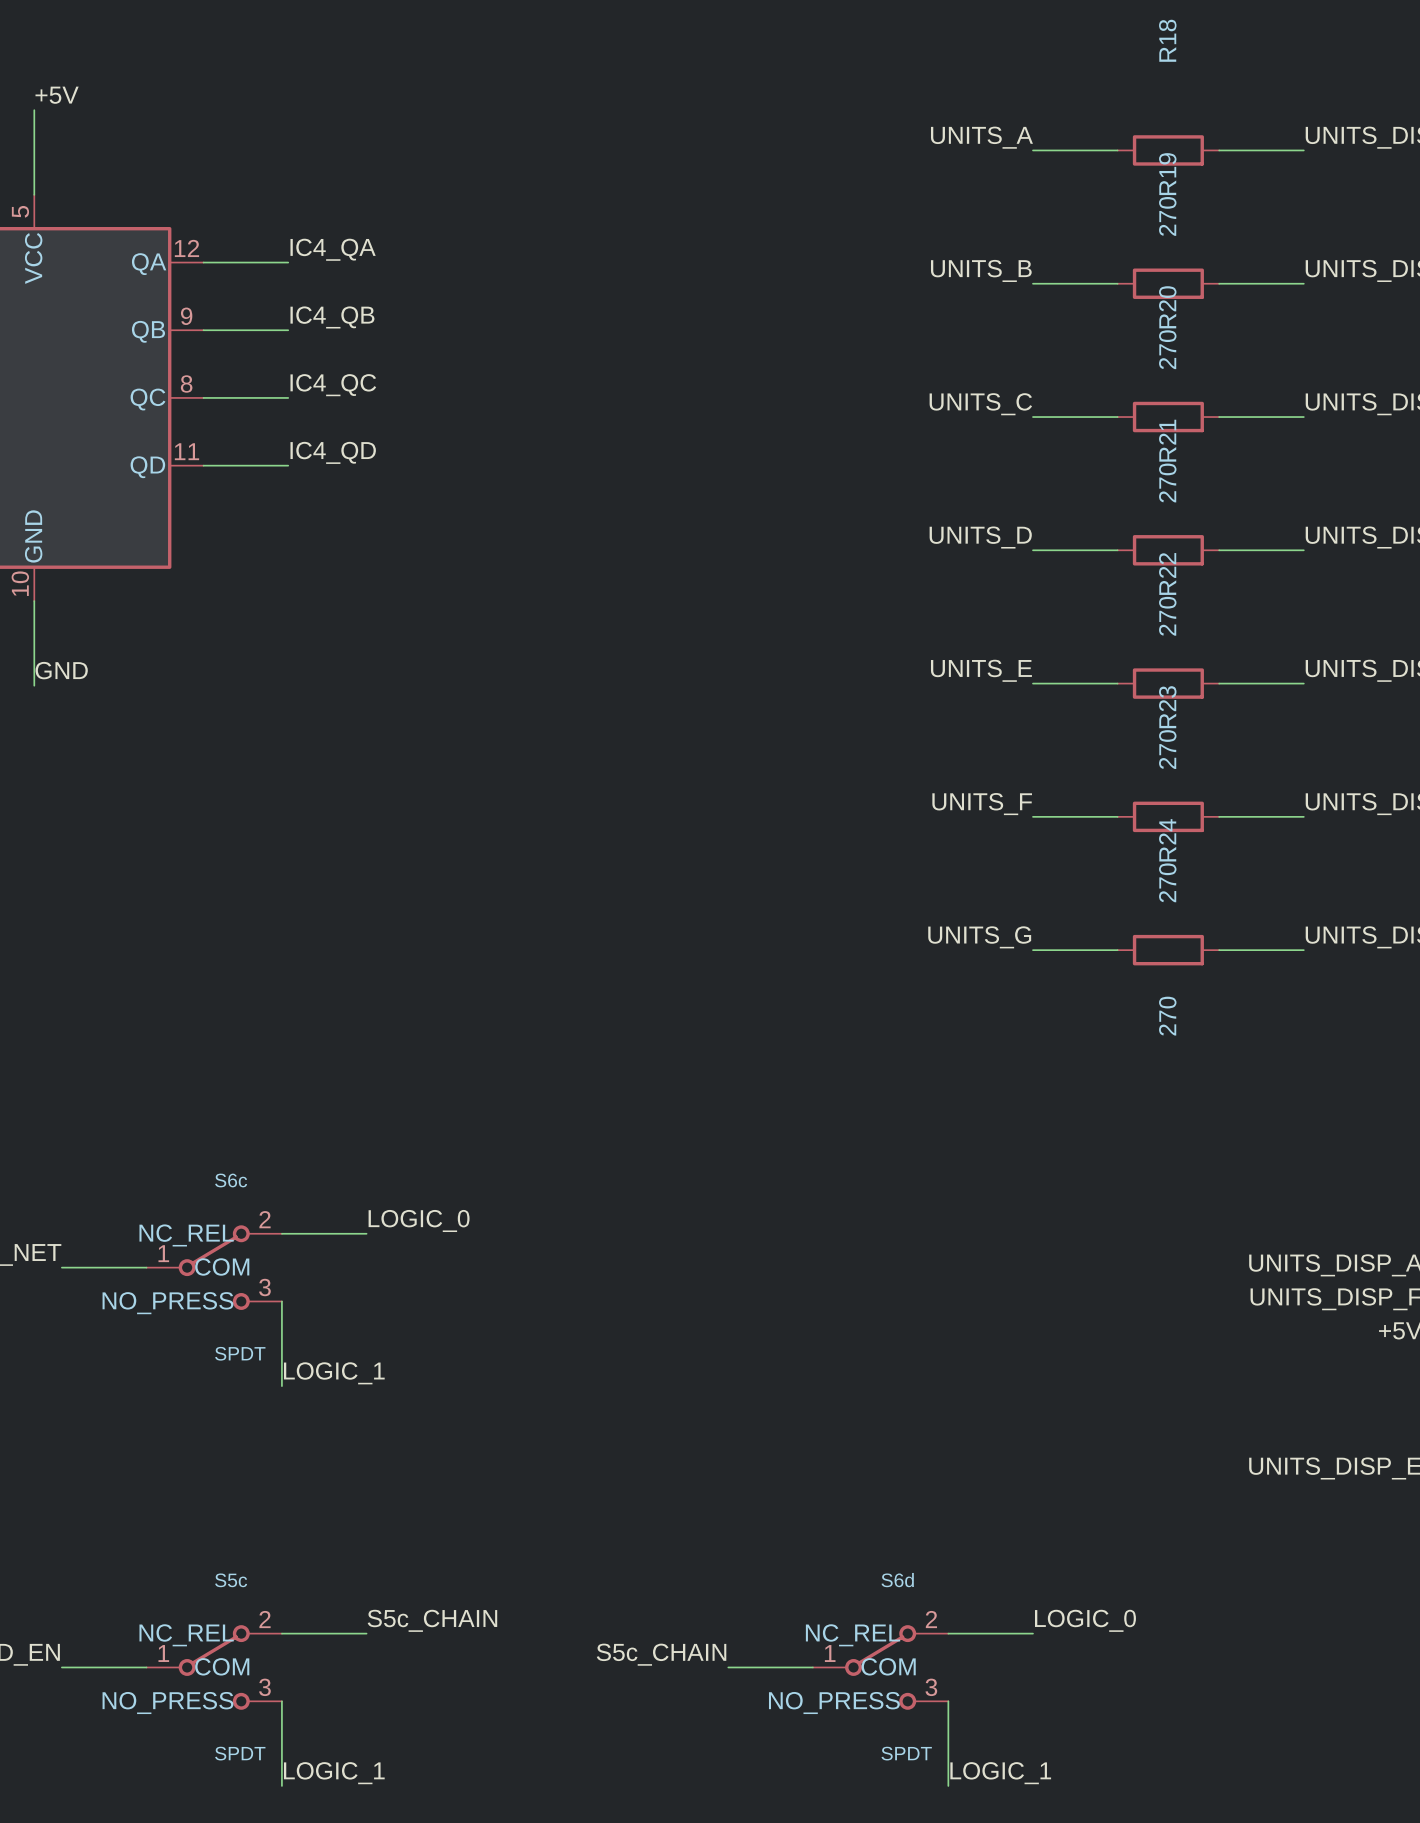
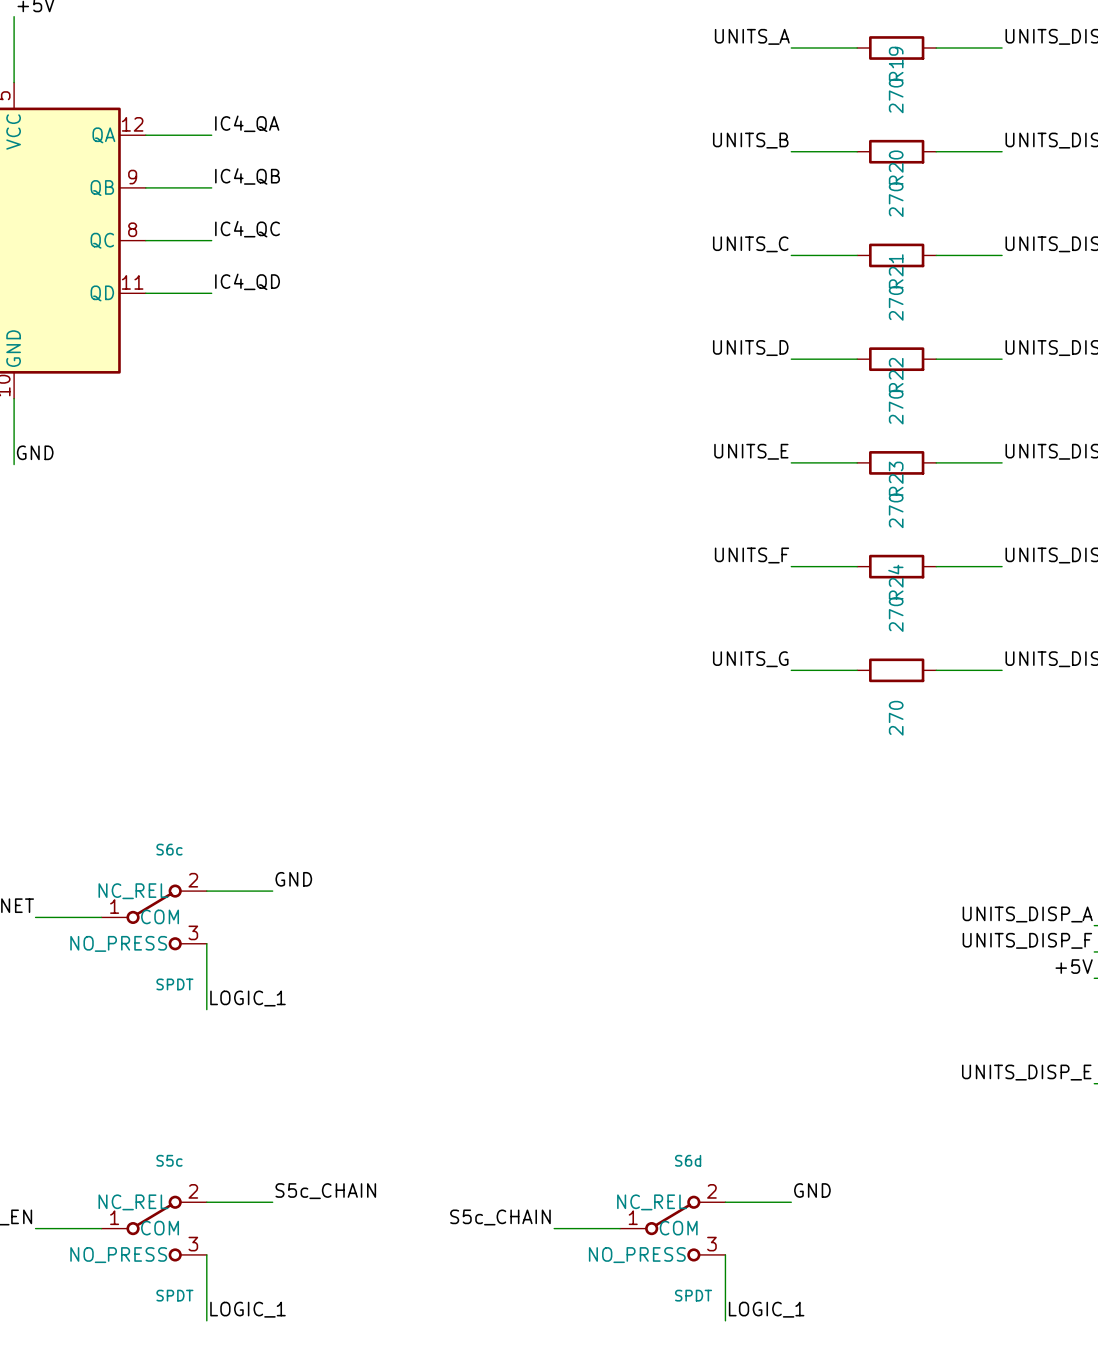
label: LOGIC_0 (419, 1220) -> GND (293, 879)
label: LOGIC_0 (1085, 1620) -> GND (812, 1190)

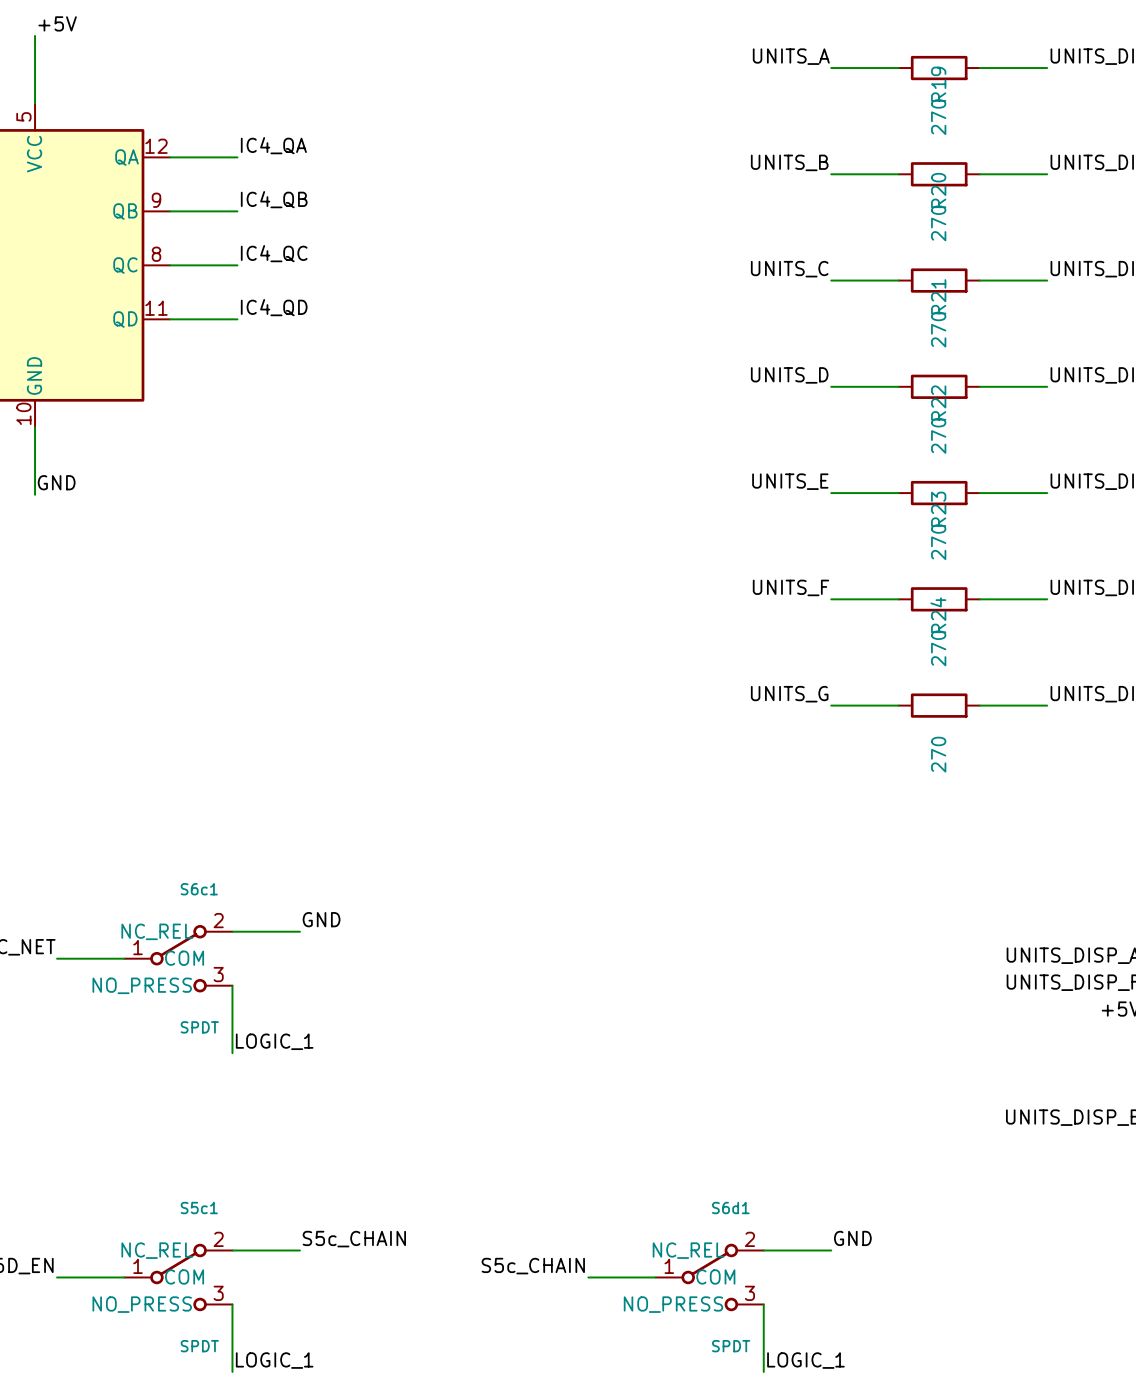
S6c name: S6c (169, 849) -> S6c1 (199, 889)
S5c name: S5c (169, 1160) -> S5c1 (199, 1208)
S6d name: S6d (688, 1160) -> S6d1 (730, 1208)

